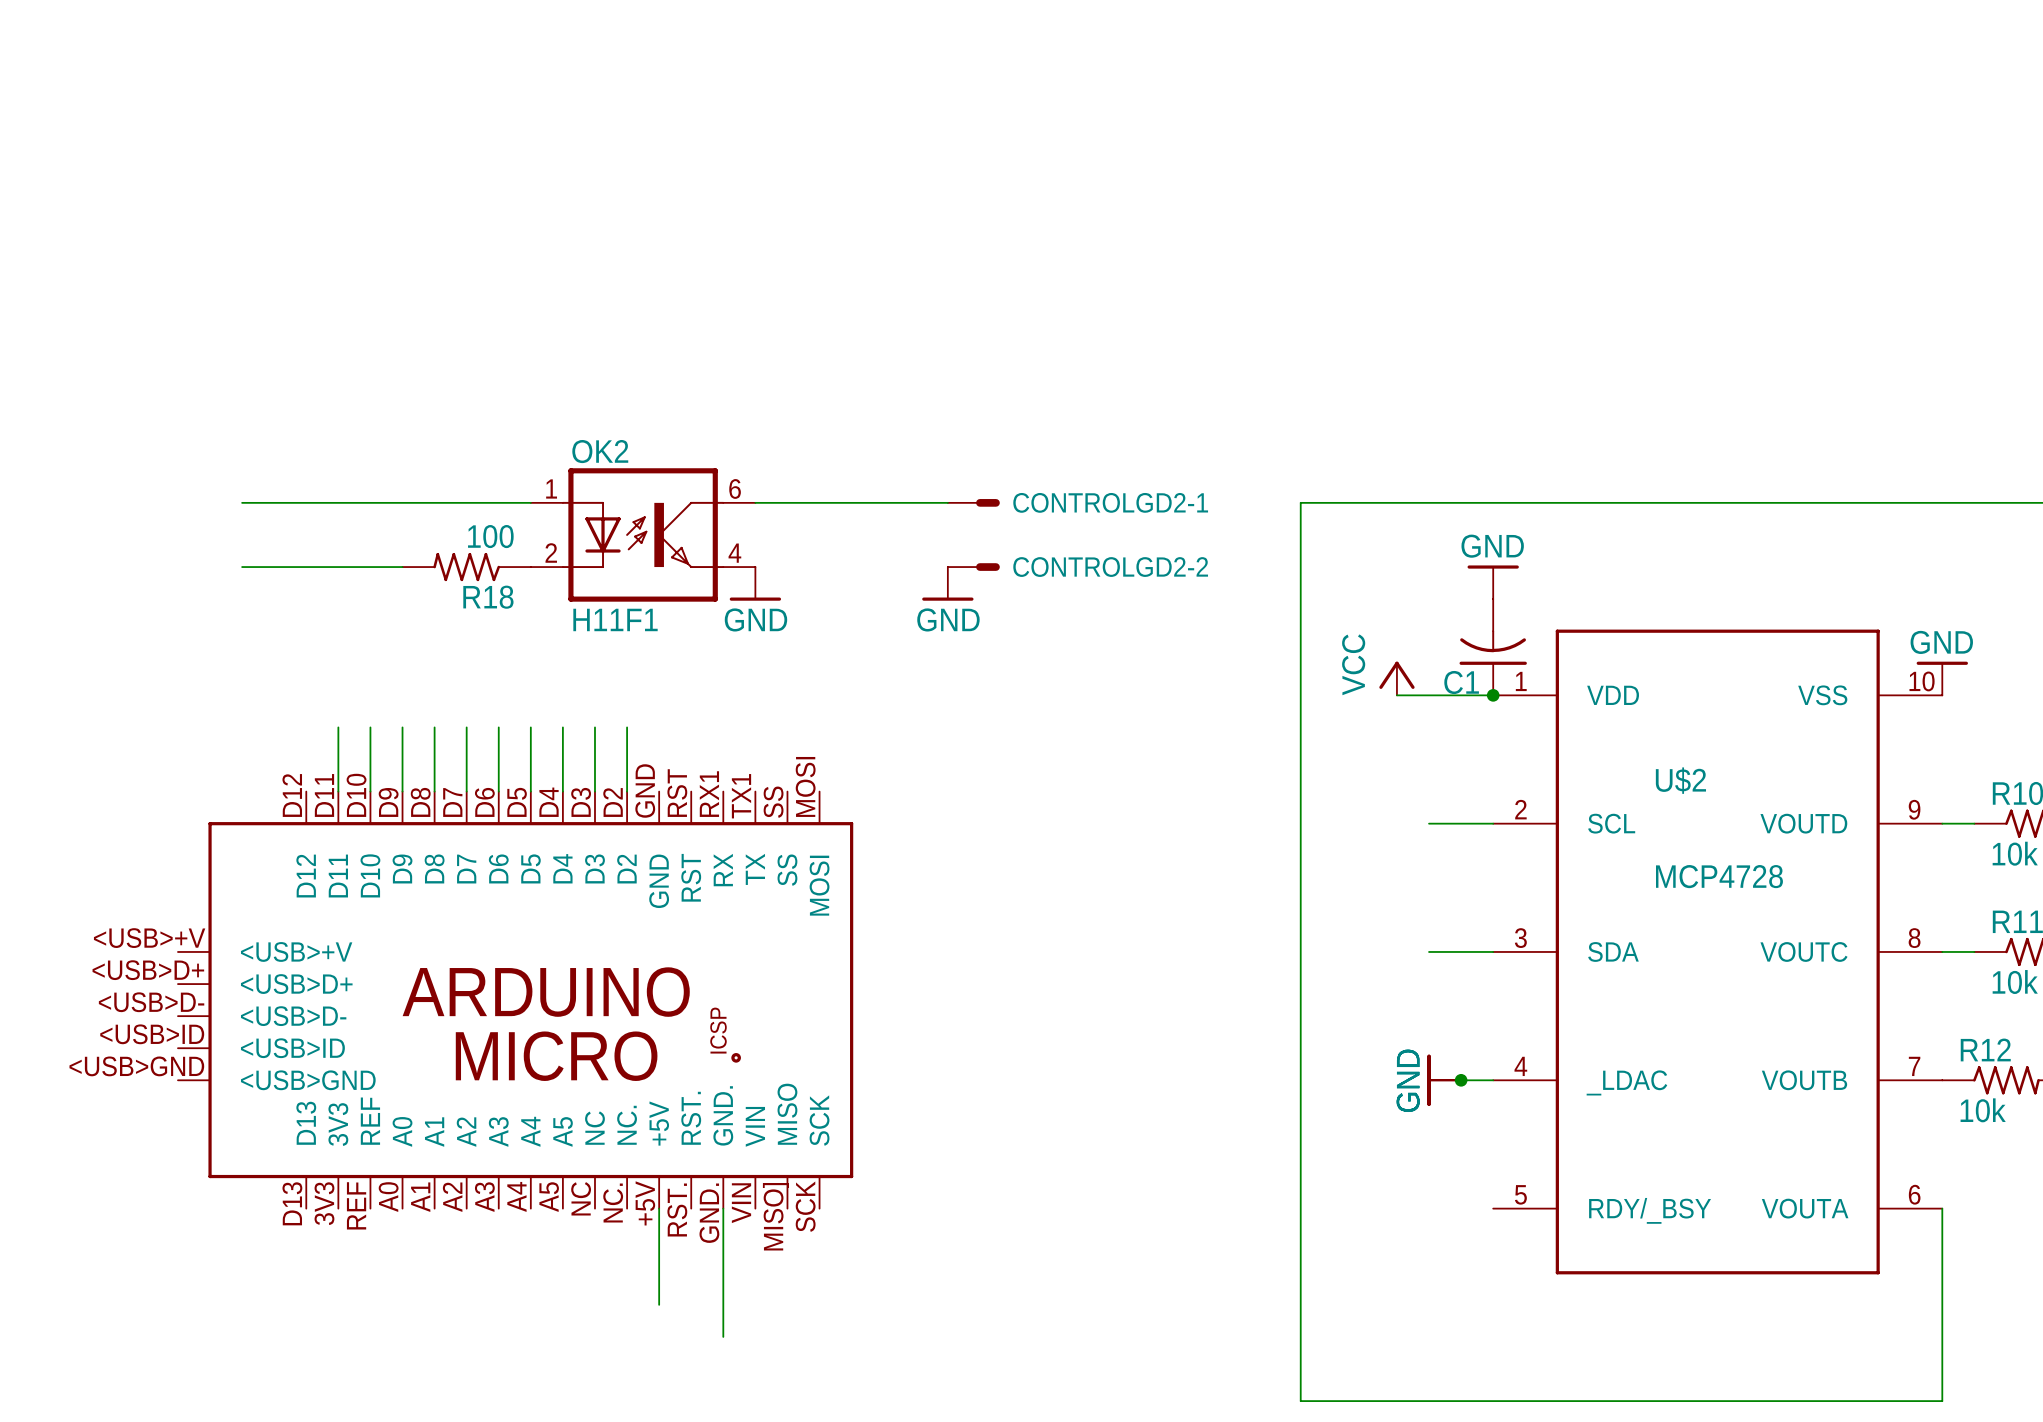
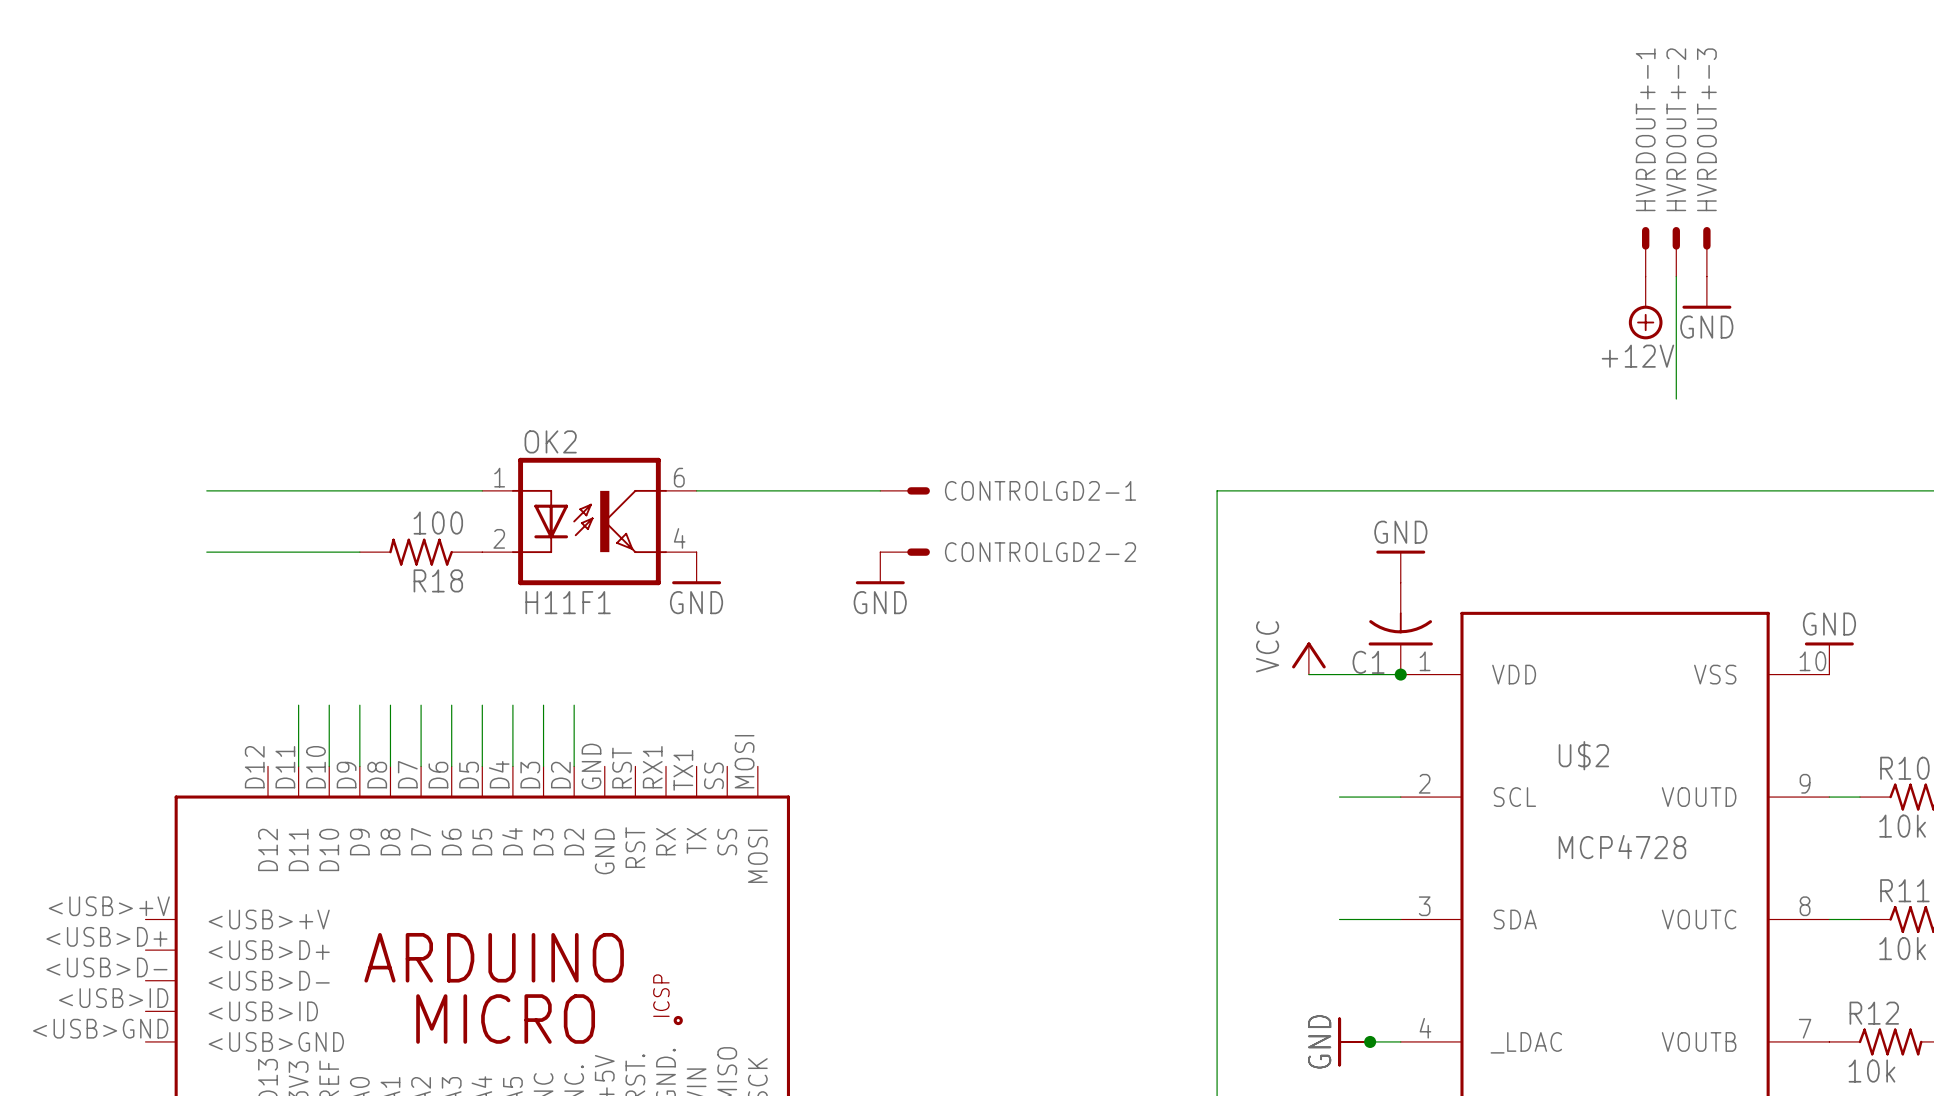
HVRDOUT+-1: none -> (1645, 251)
HVRDOUT+-2: none -> (1676, 251)
HVRDOUT+-3: none -> (1706, 251)
wire: none -> (1676, 276) (1676, 399)
power symbol: none -> GND (1706, 292)
power symbol: none -> +12V (1645, 307)

